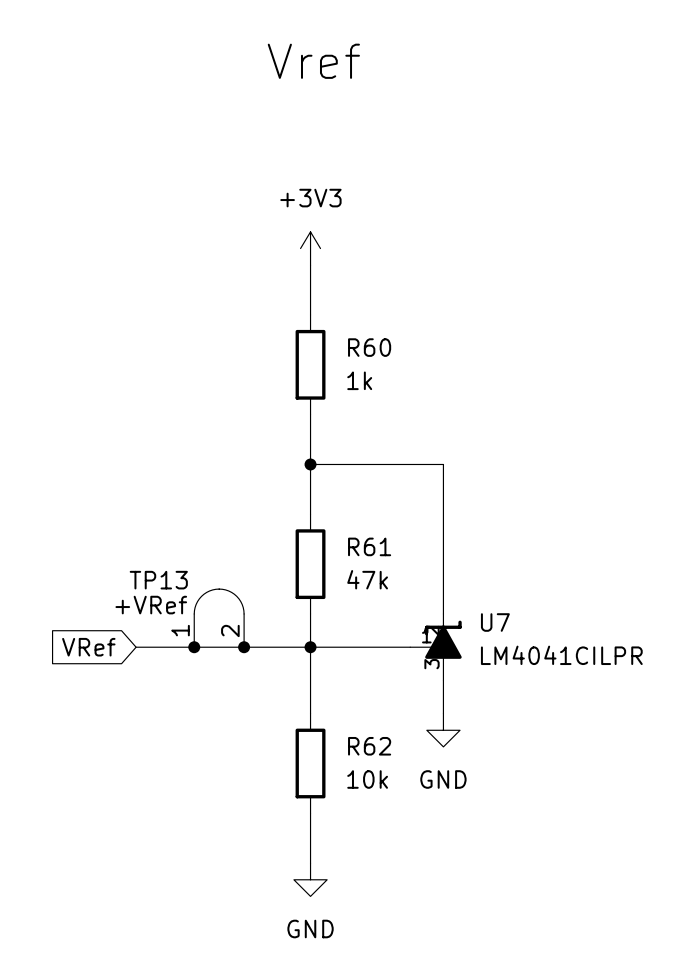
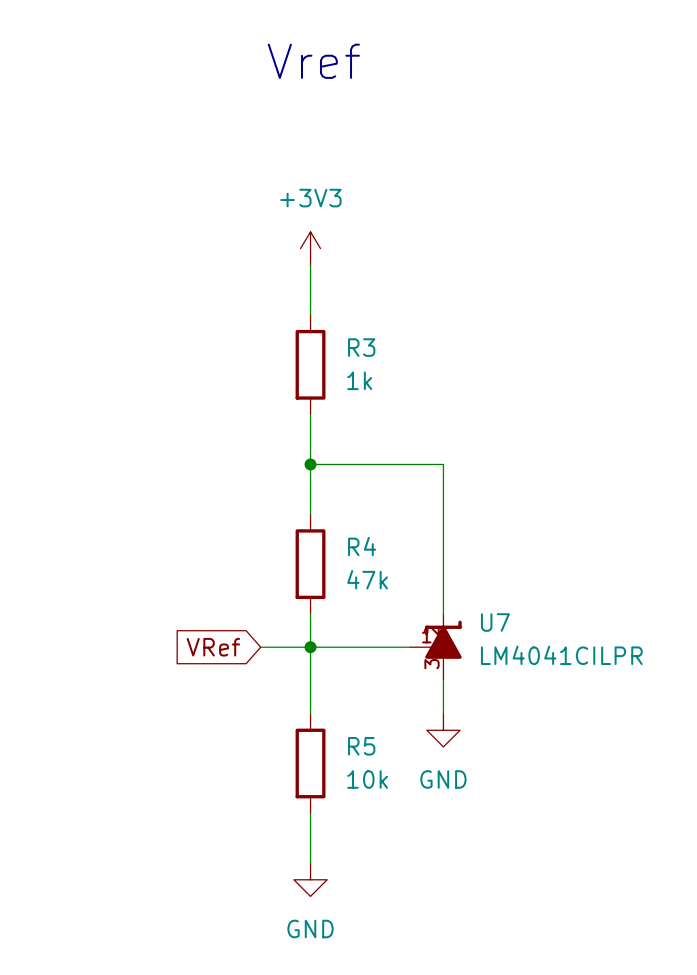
R60 name: R60 (369, 347) -> R3 (361, 347)
R61 name: R61 (369, 546) -> R4 (362, 546)
TP13: +VRef (219, 618) -> none
global label position: VRef (88, 647) -> VRef (213, 647)
wire: (136, 647) (260, 647) -> none
junction: (194, 647) -> none
junction: (244, 647) -> none
R62 name: R62 (369, 746) -> R5 (361, 746)

